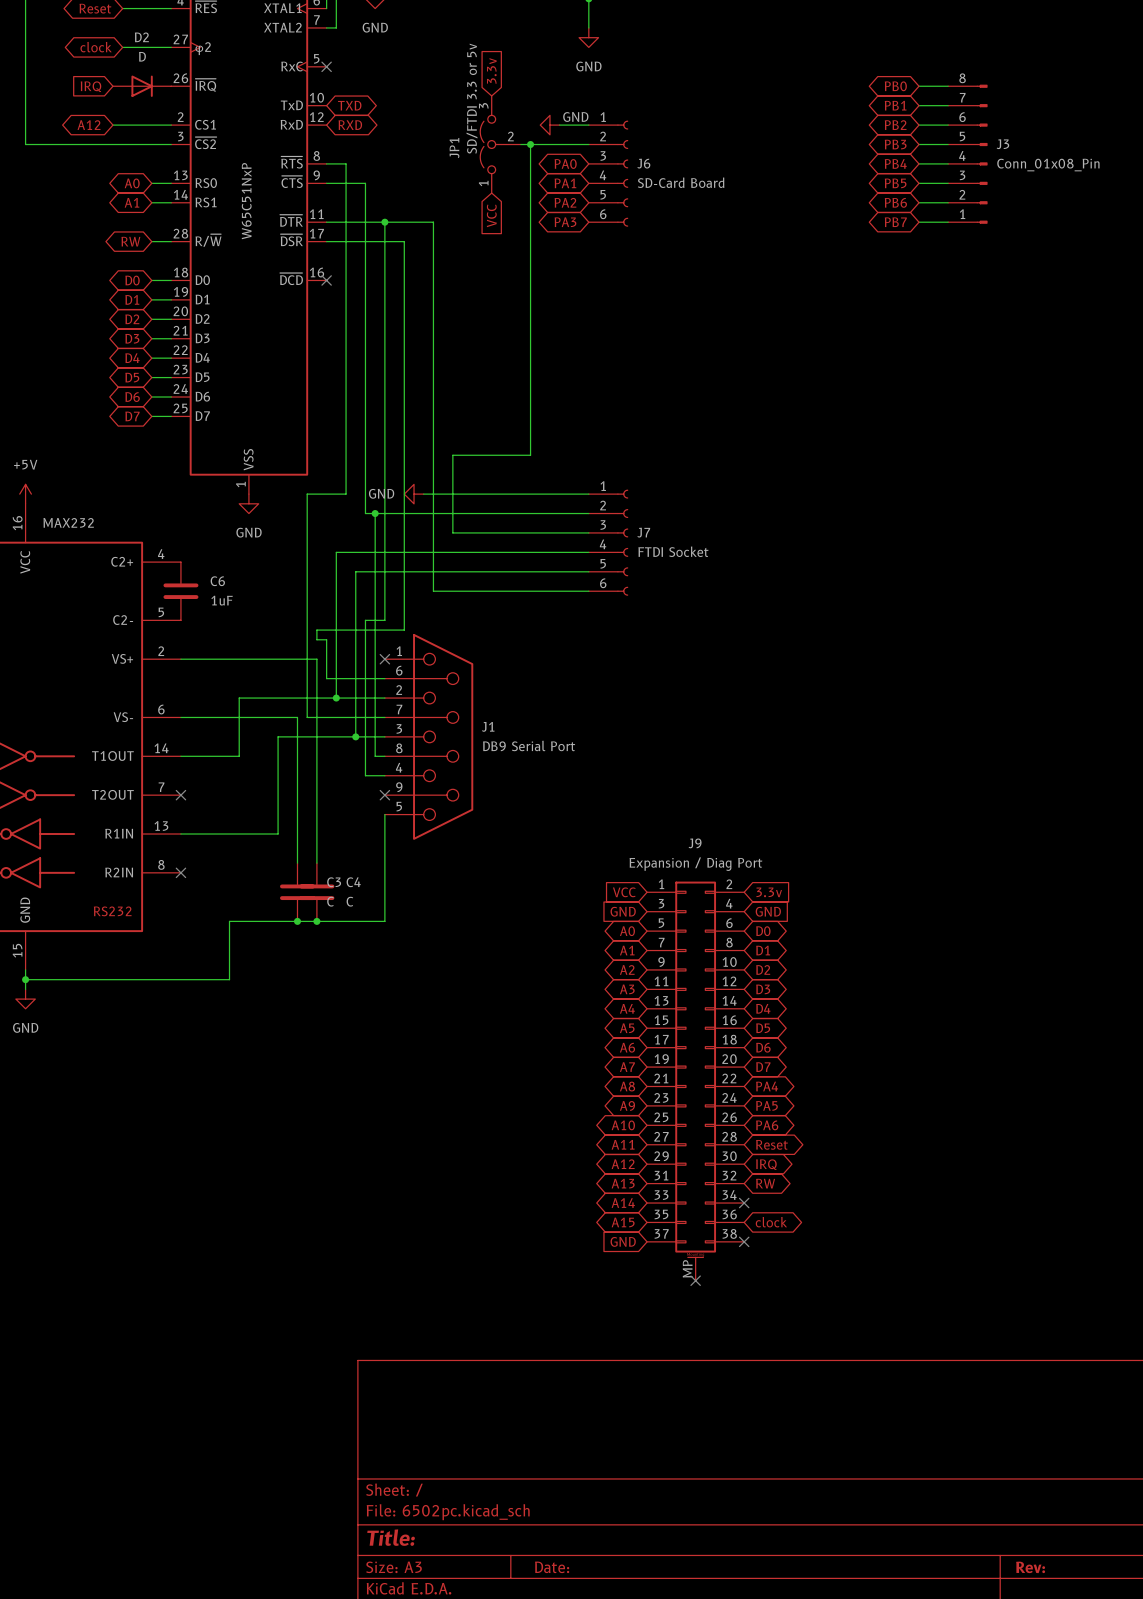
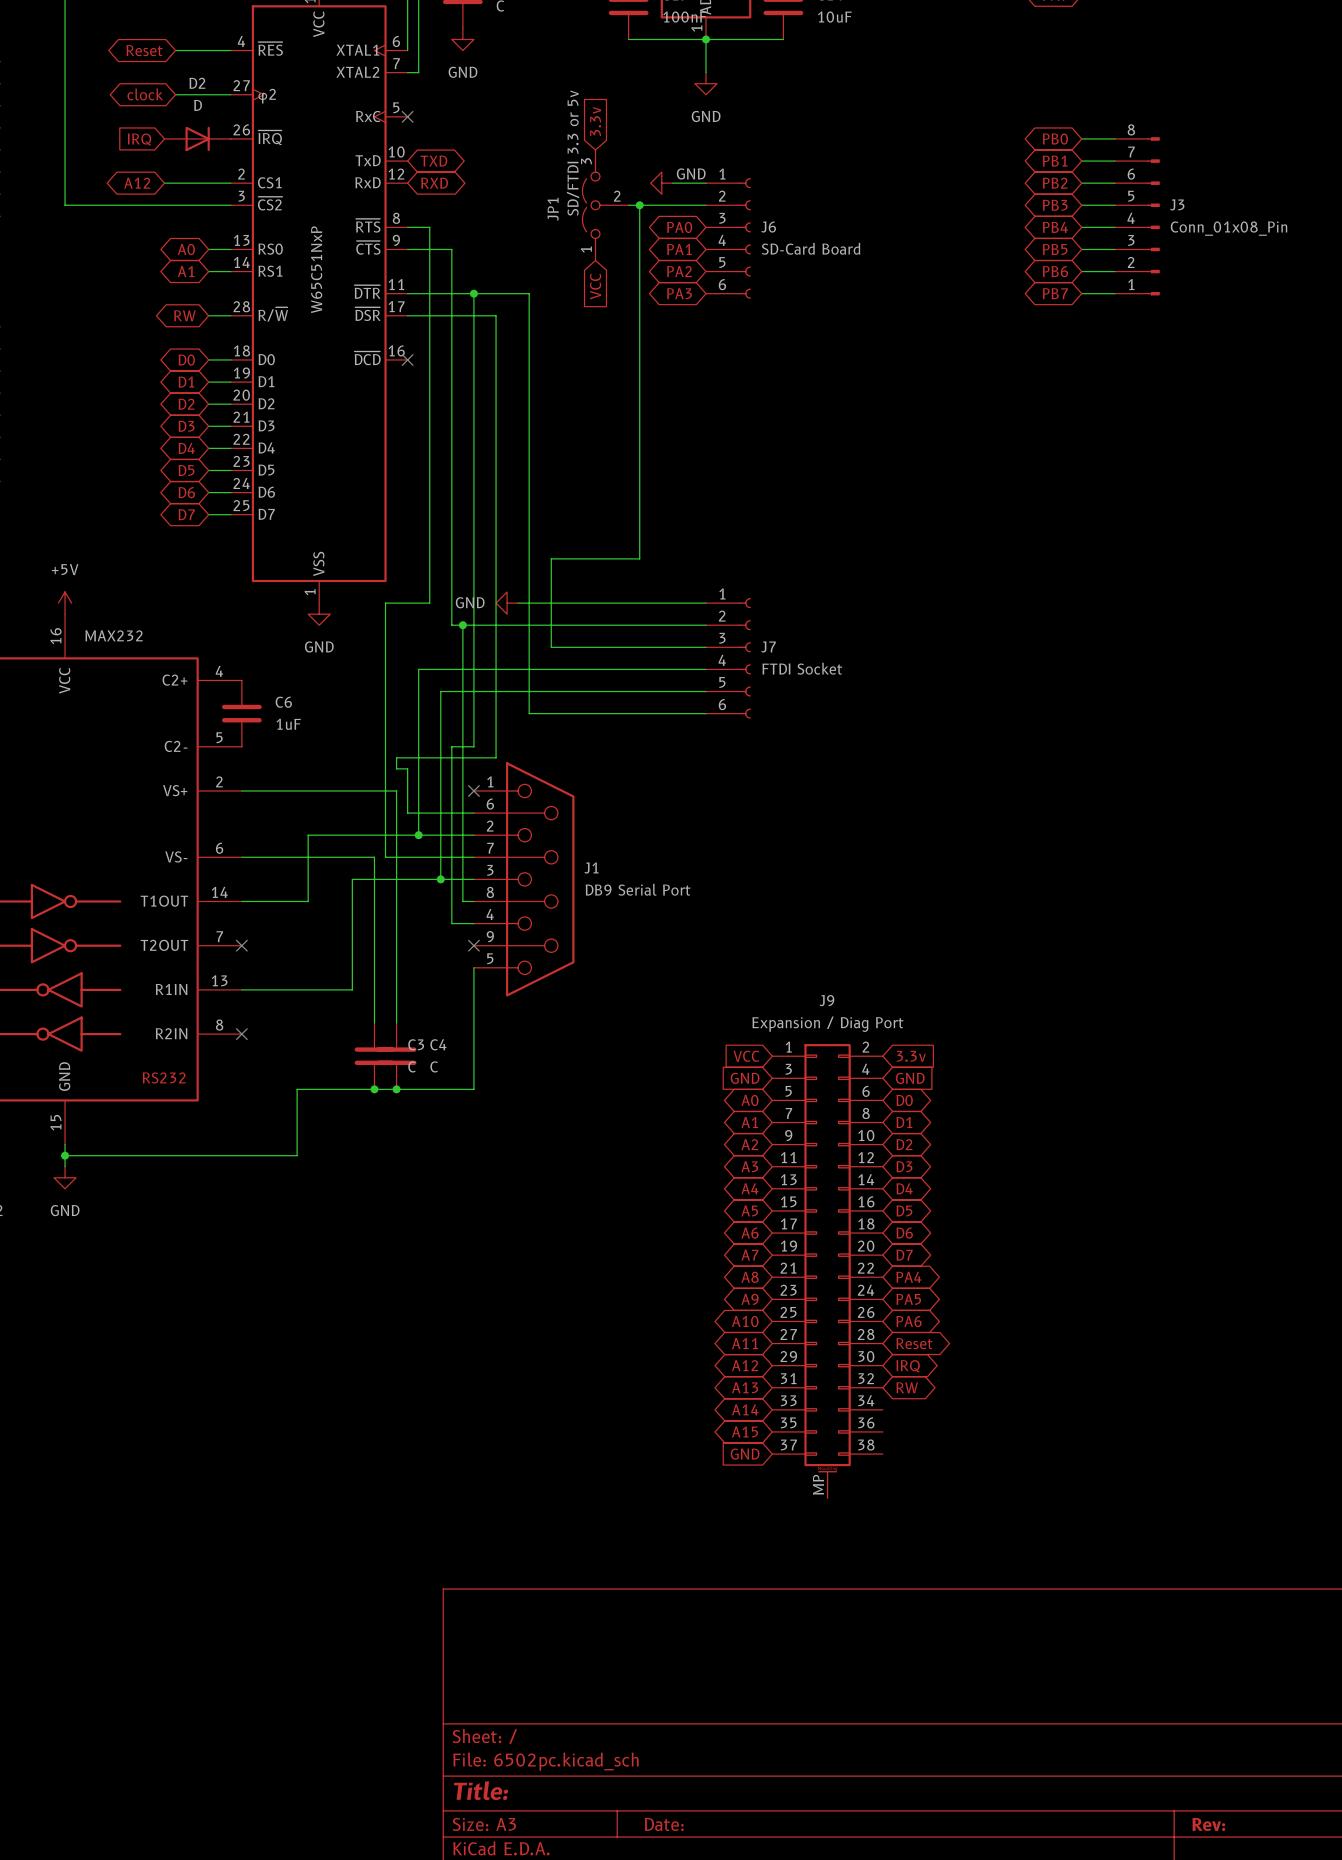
no-connect mark: (744, 1203) -> none
global label: clock (771, 1222) -> none
no-connect mark: (744, 1241) -> none
no-connect mark: (695, 1280) -> none

